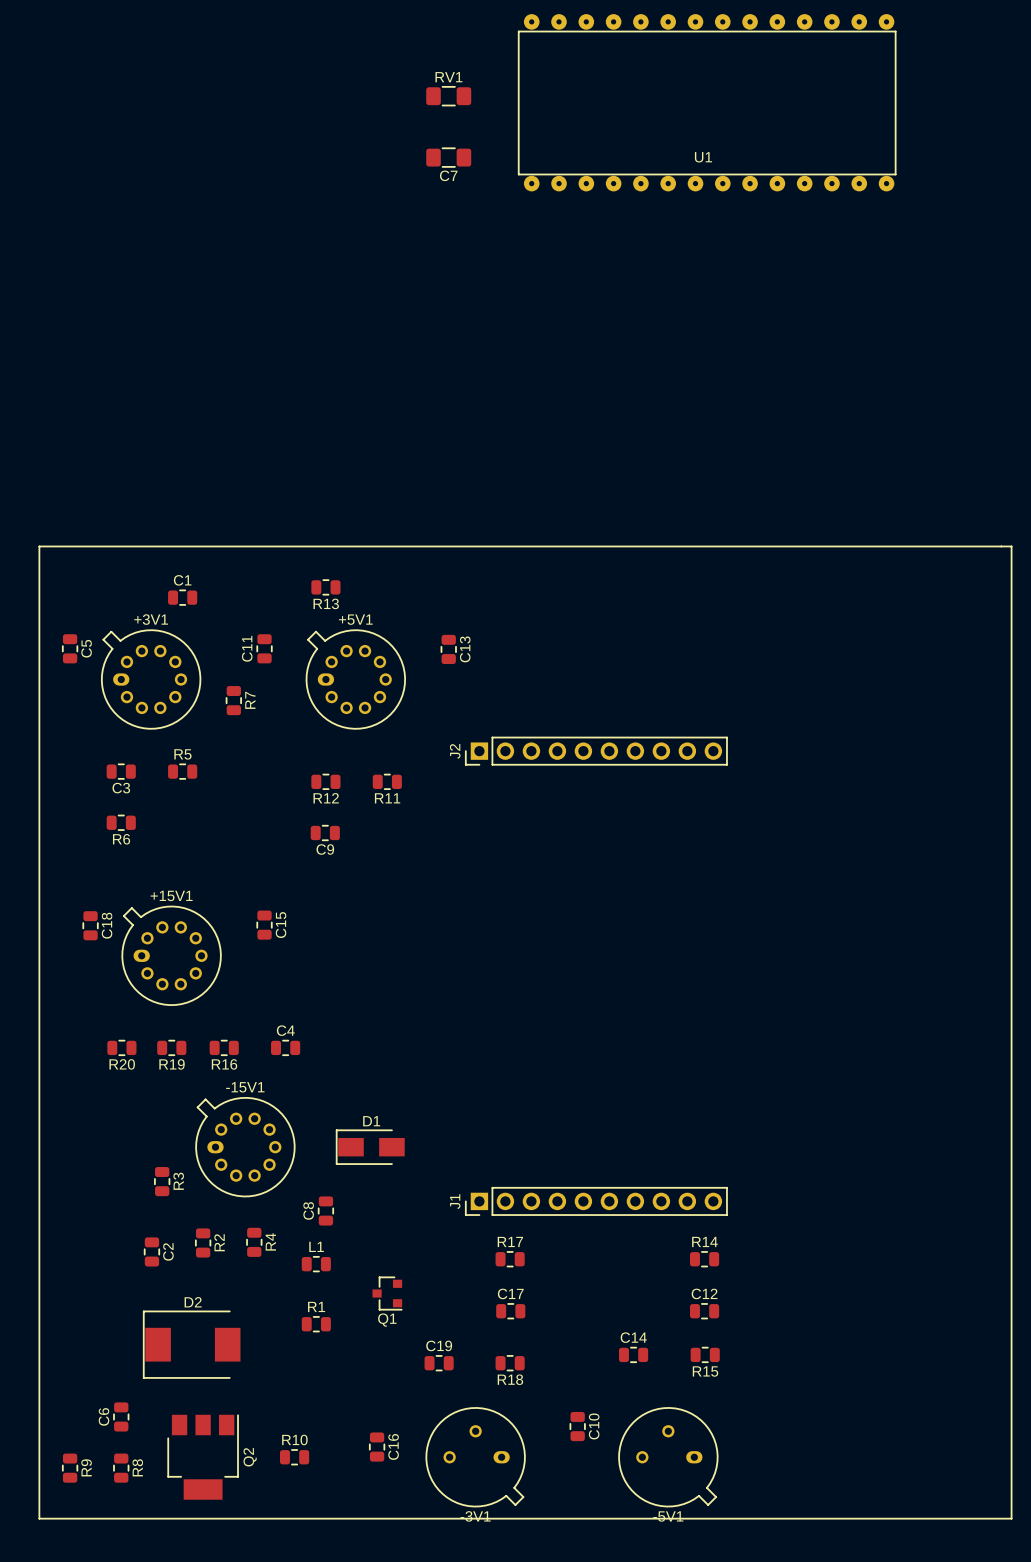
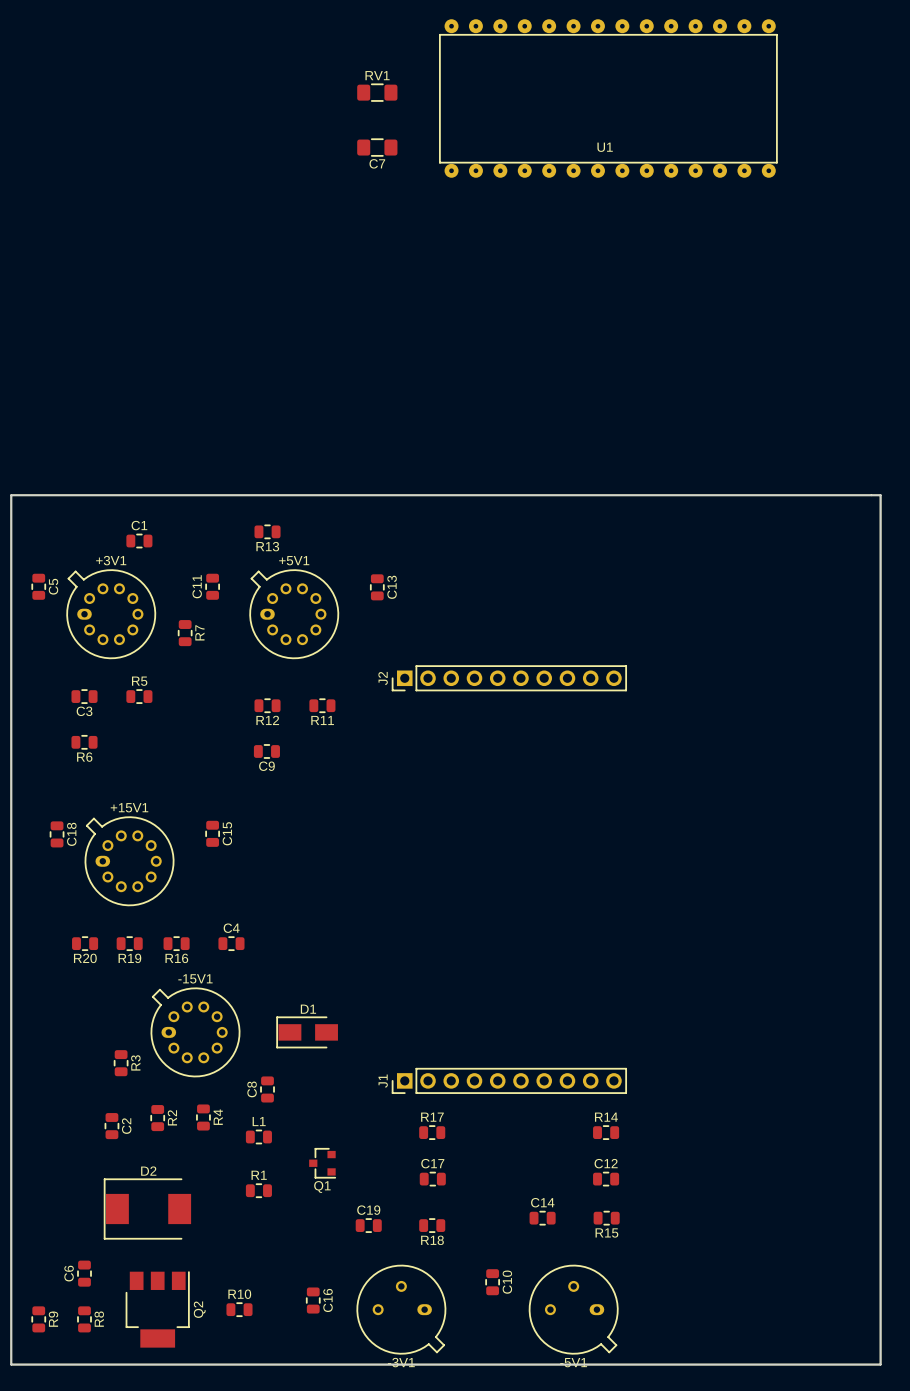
board edge: none -> (11, 495) (880, 495) (880, 1364) (11, 1364) (11, 495)

